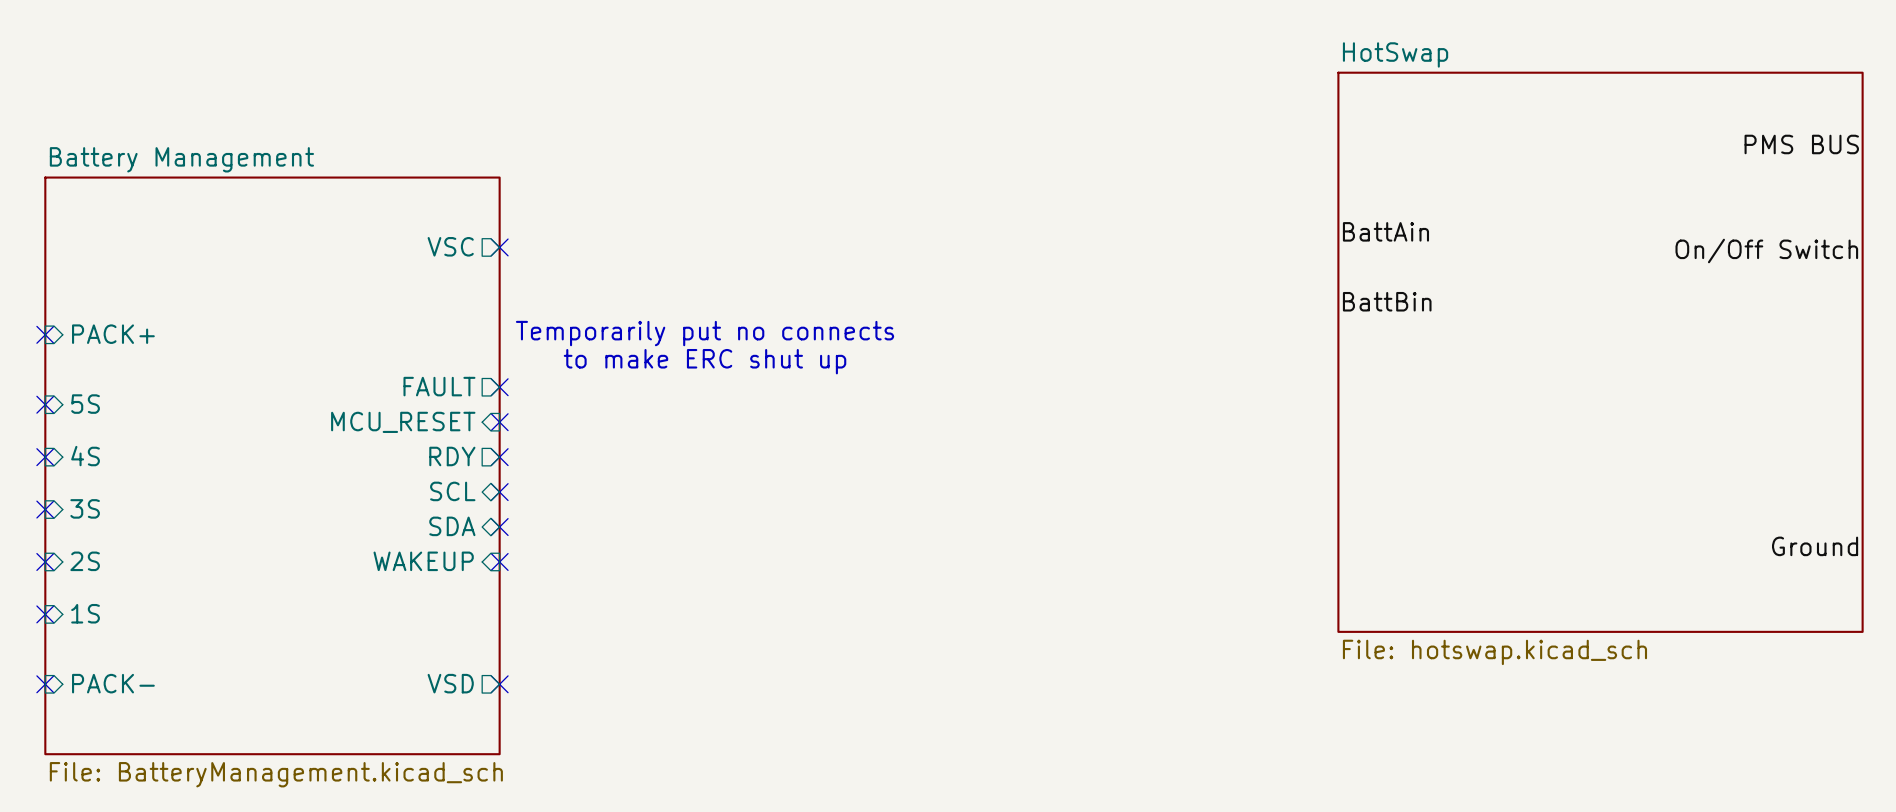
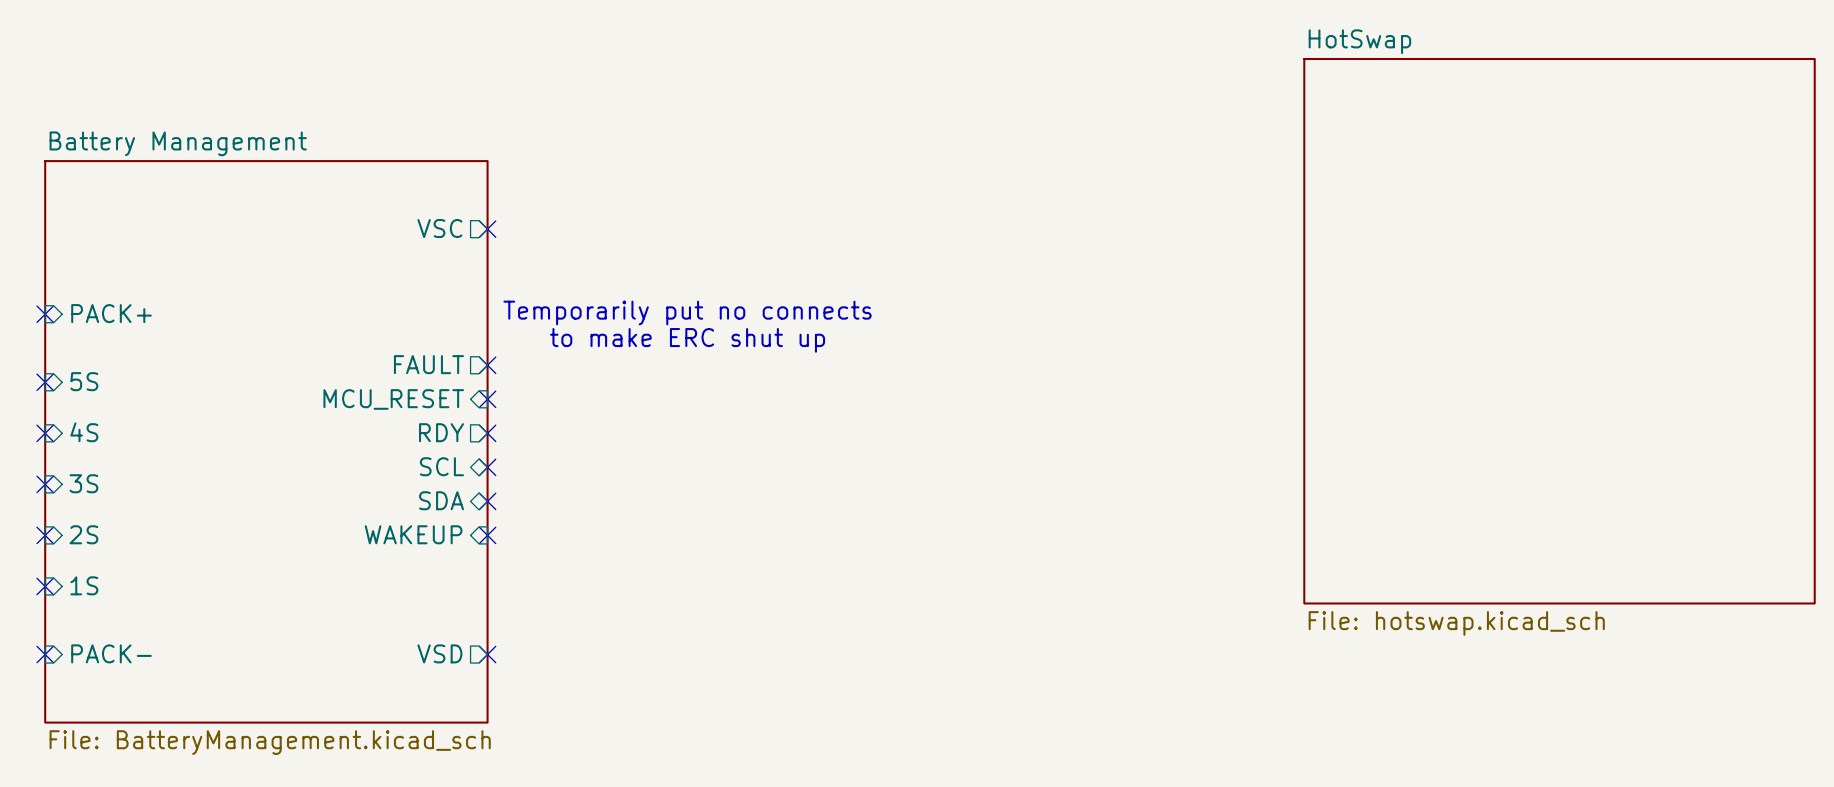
label: PMS BUS (1801, 144) -> none
label: BattAin (1385, 231) -> none
label: On/Off Switch (1766, 250) -> none
label: BattBin (1387, 301) -> none
label: Ground (1815, 546) -> none

